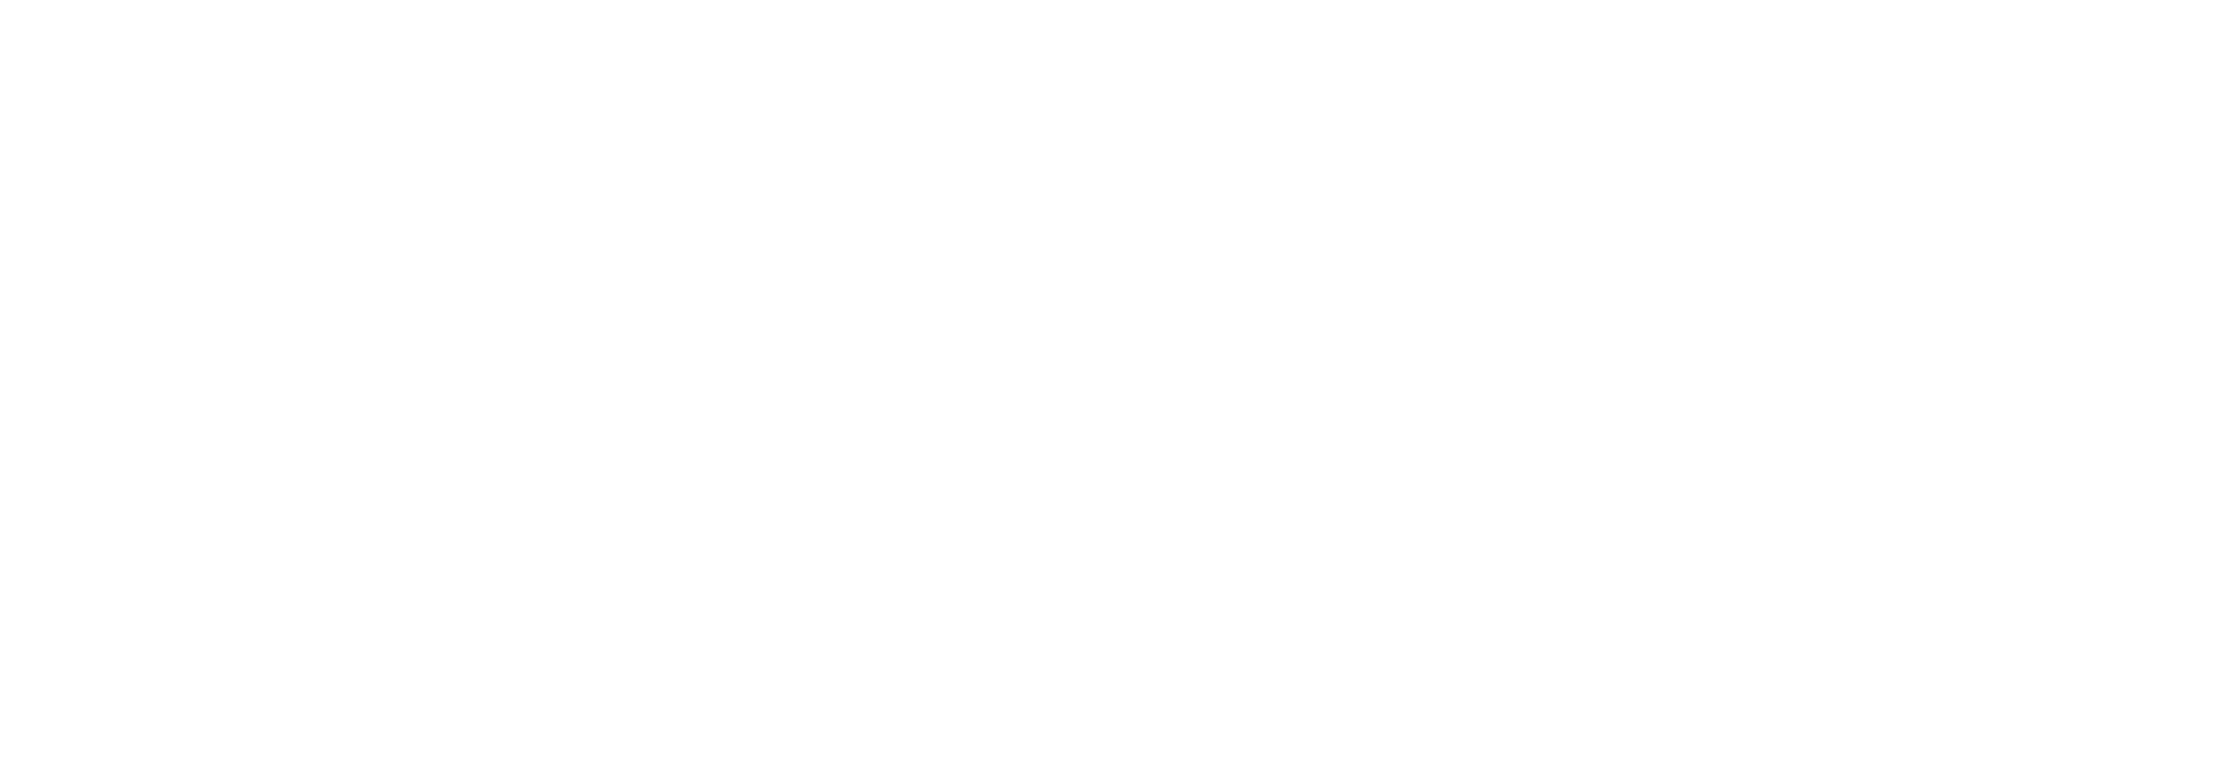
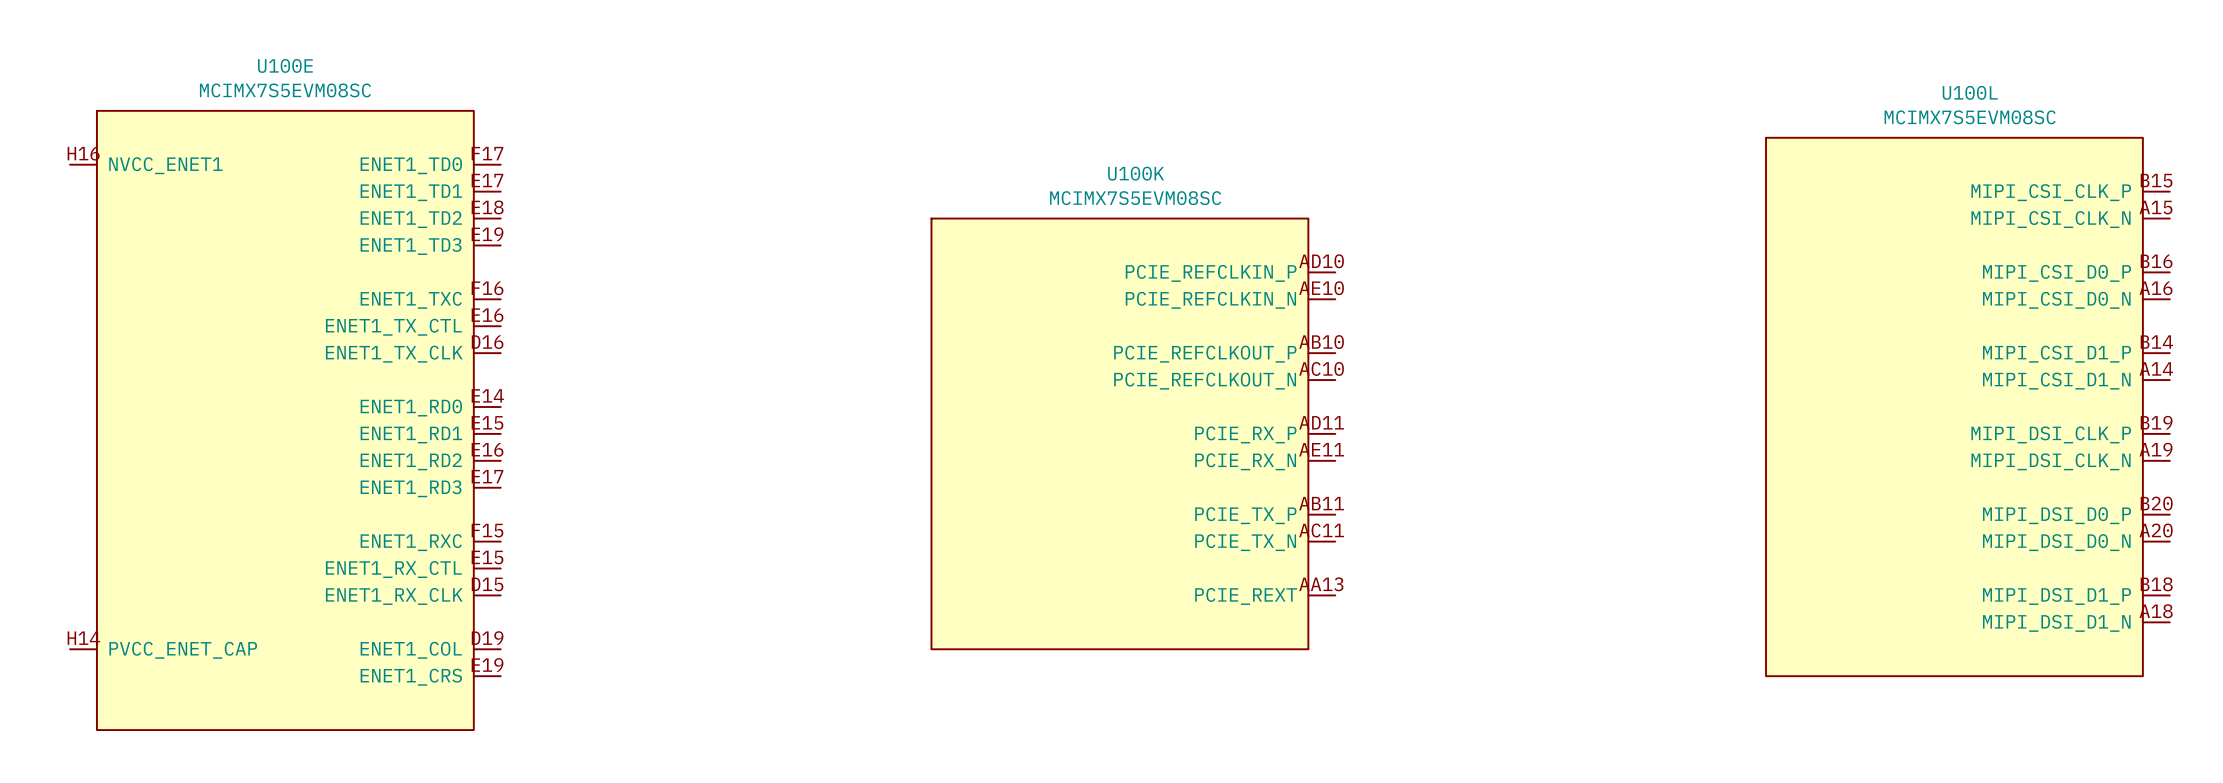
U100L: none -> MCIMX7S5EVM08SC (1967, 406)
U100E: none -> MCIMX7S5EVM08SC (285, 420)
U100K: none -> MCIMX7S5EVM08SC (1133, 433)

